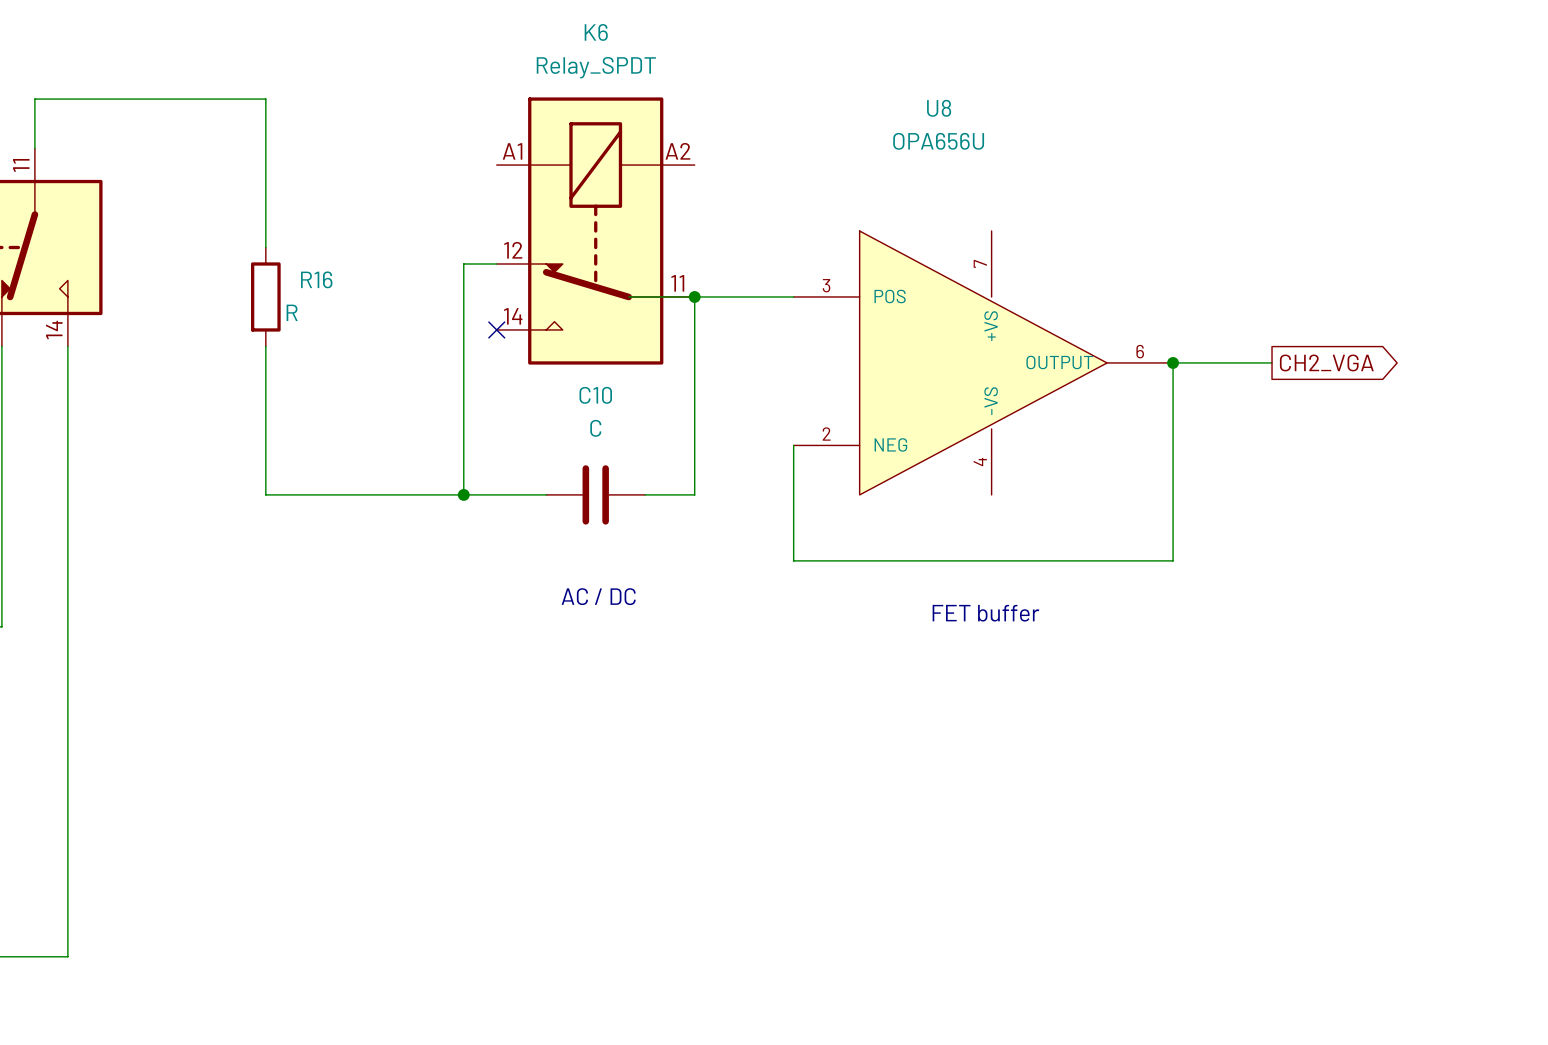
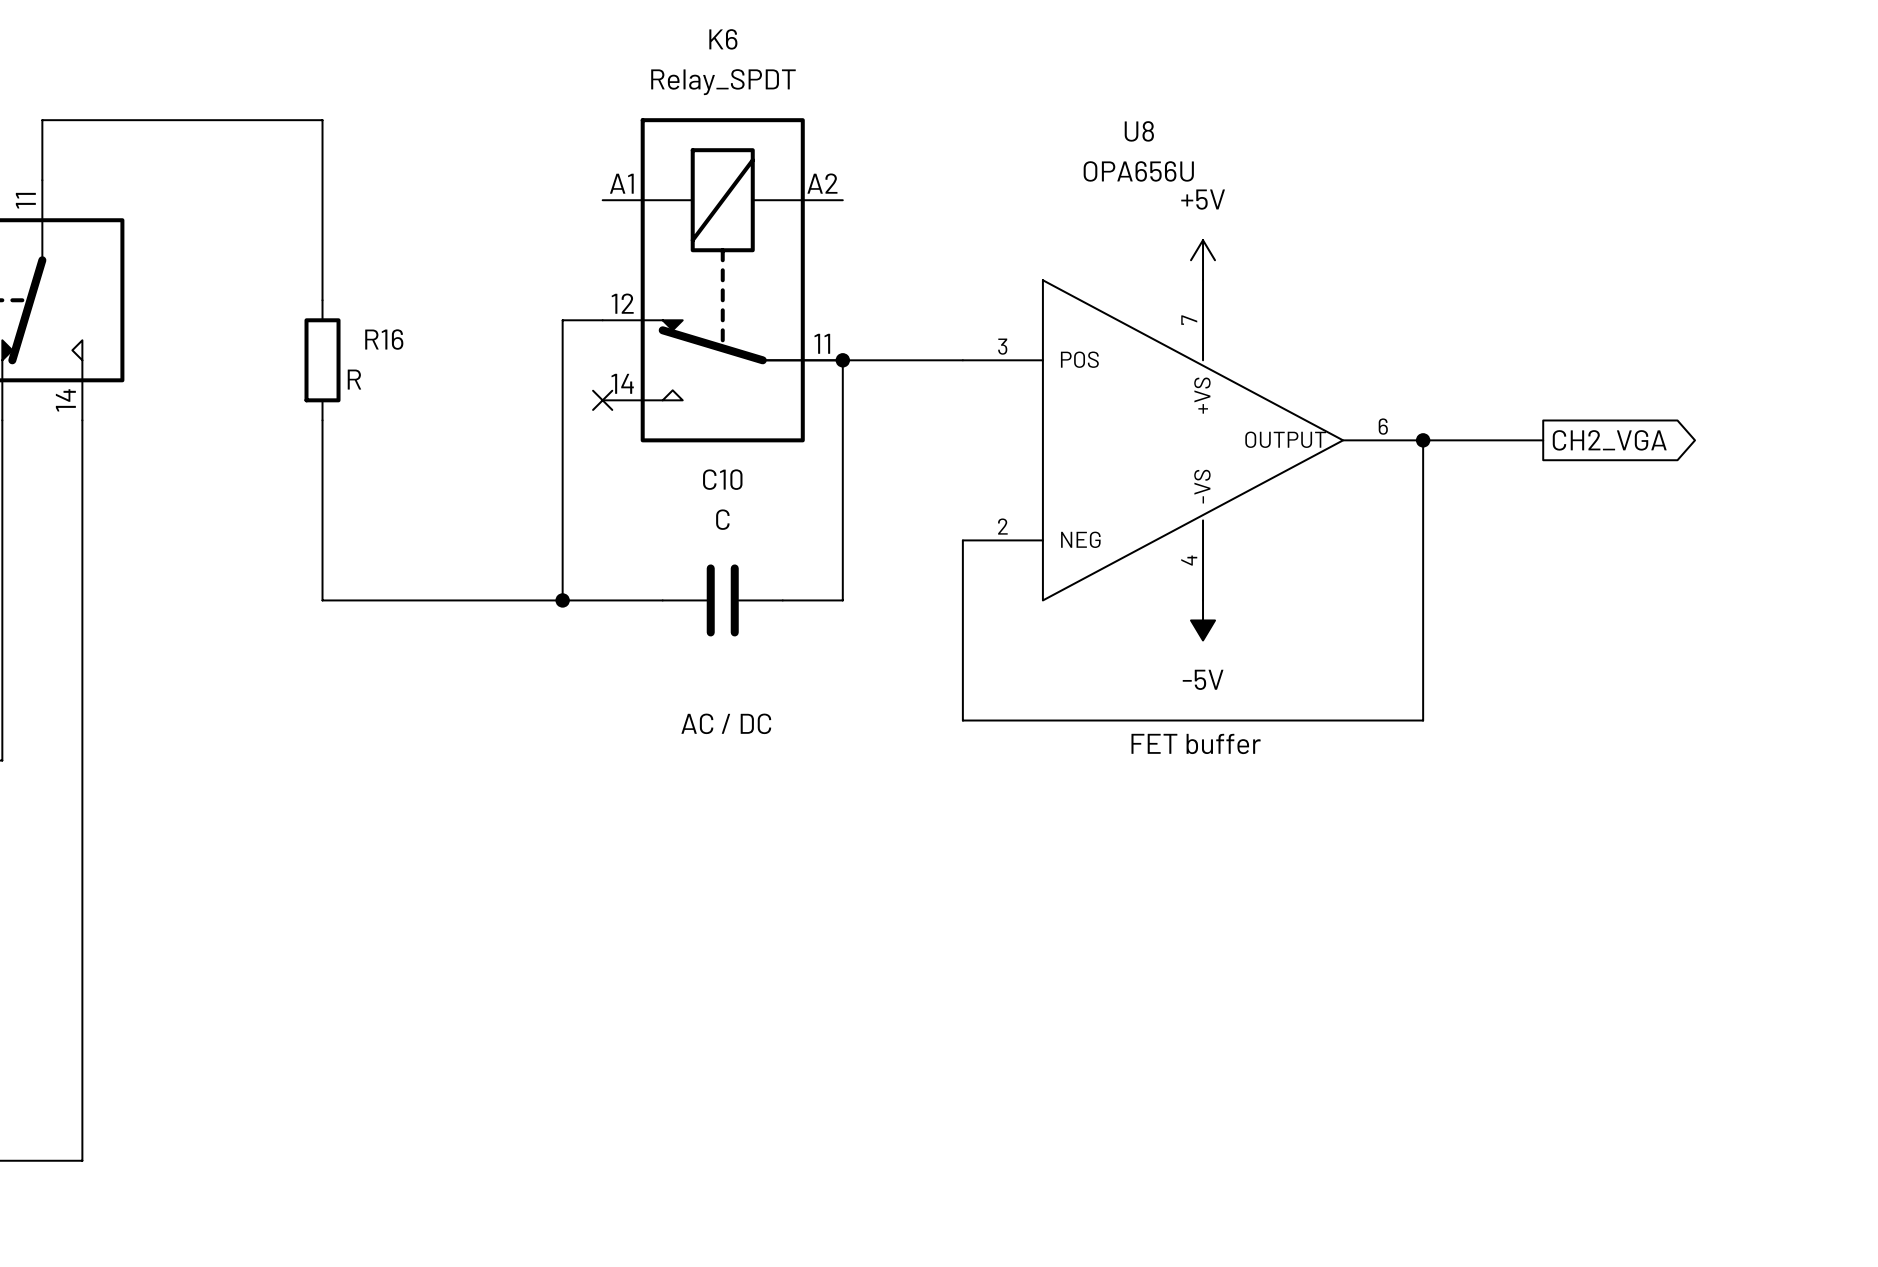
power symbol: none -> +5V (1203, 260)
power symbol: none -> -5V (1203, 620)
wire: (793, 560) (1173, 560) -> (962, 680) (962, 720) (1423, 720) (1423, 680)

